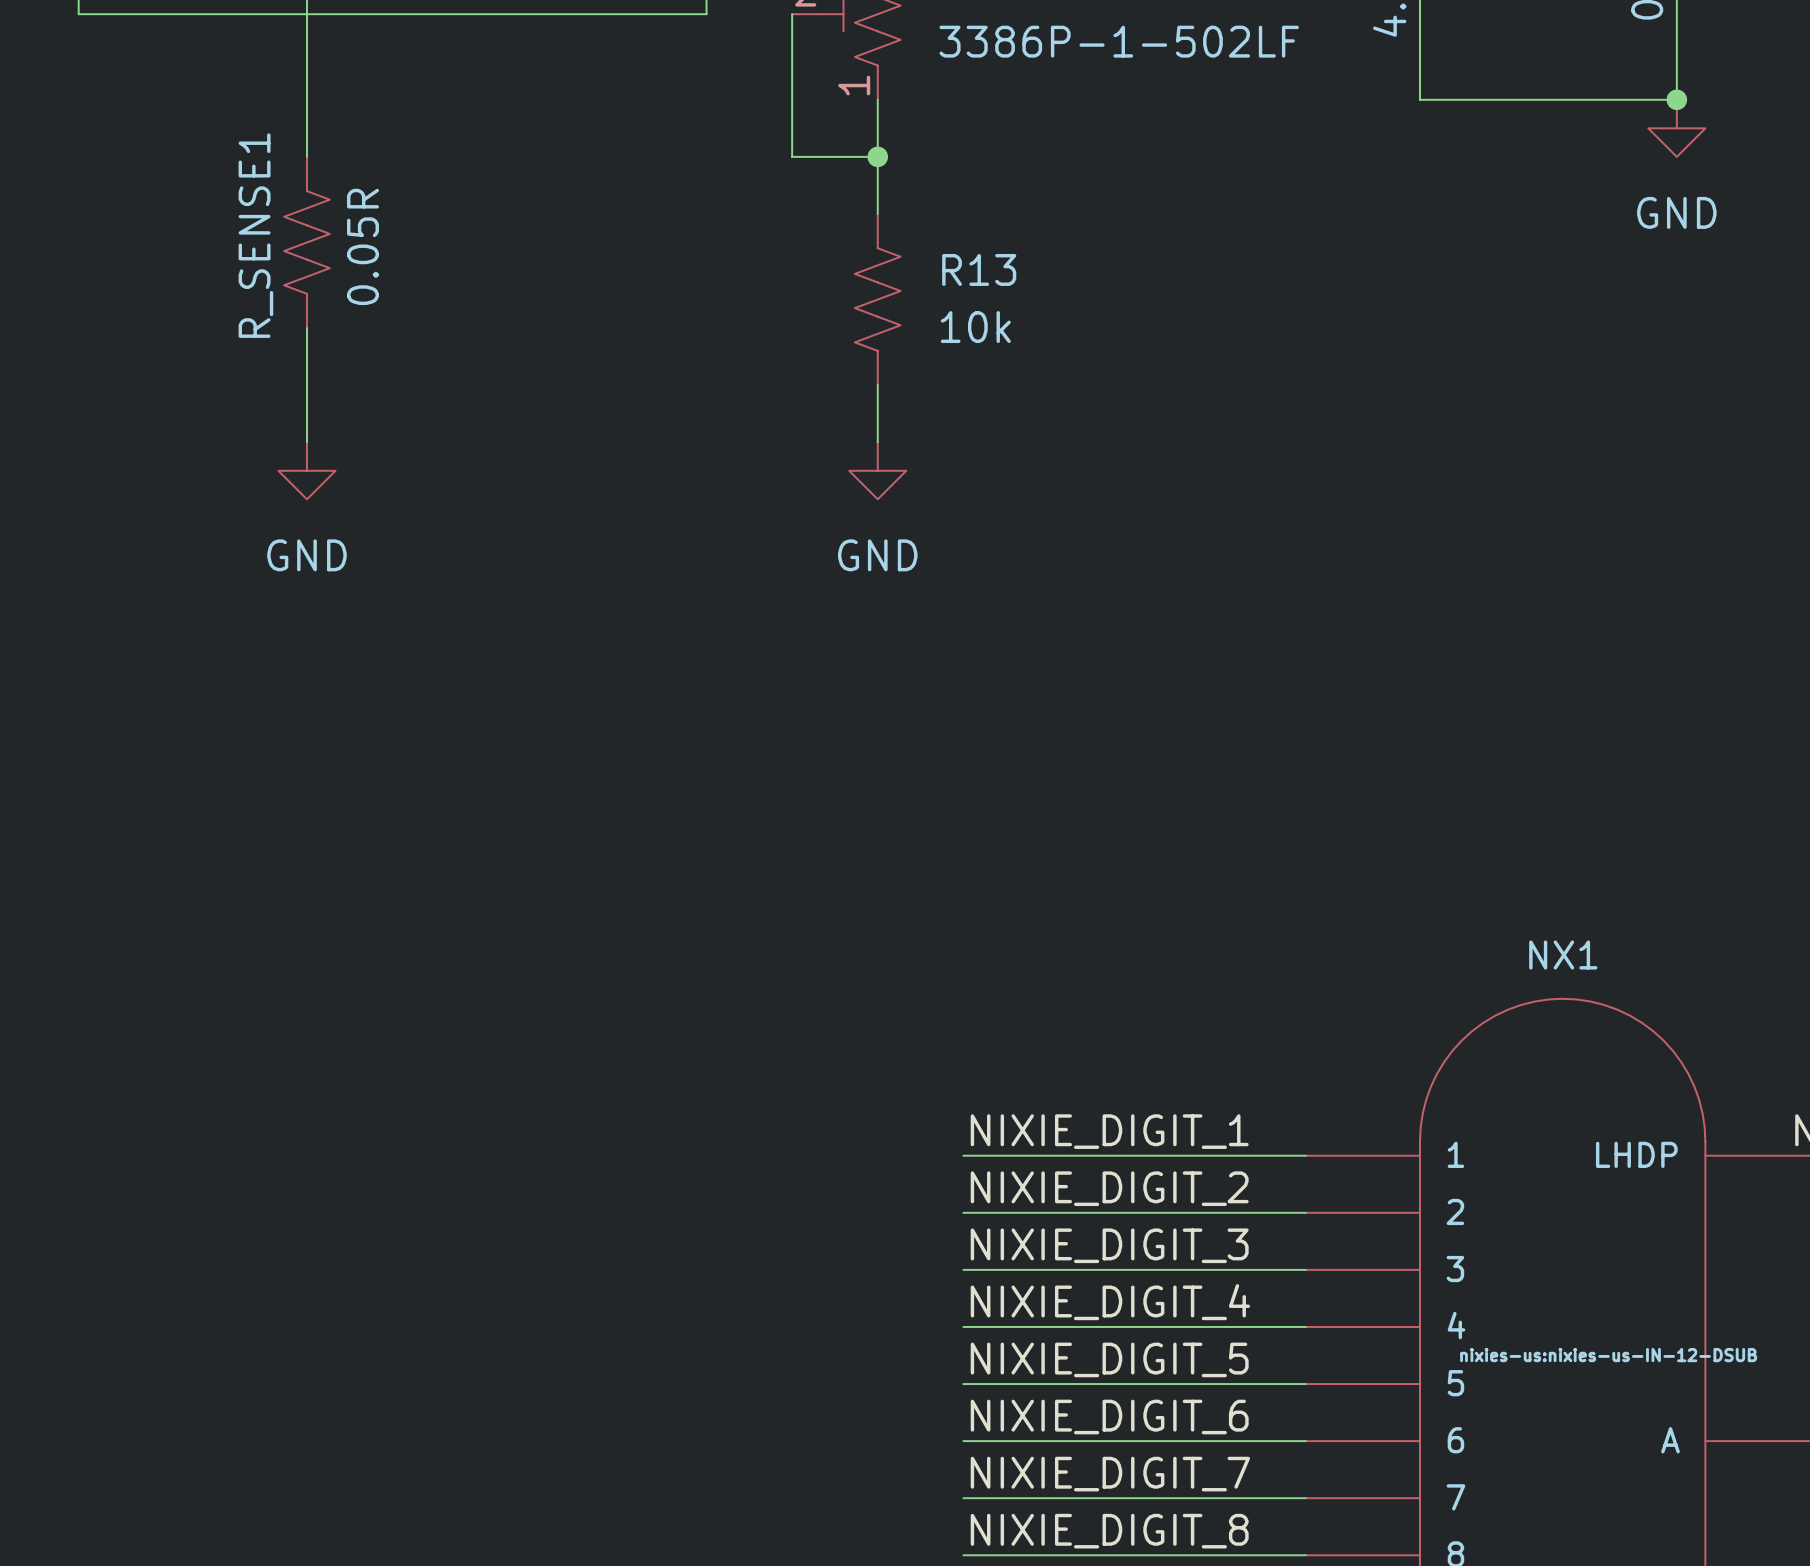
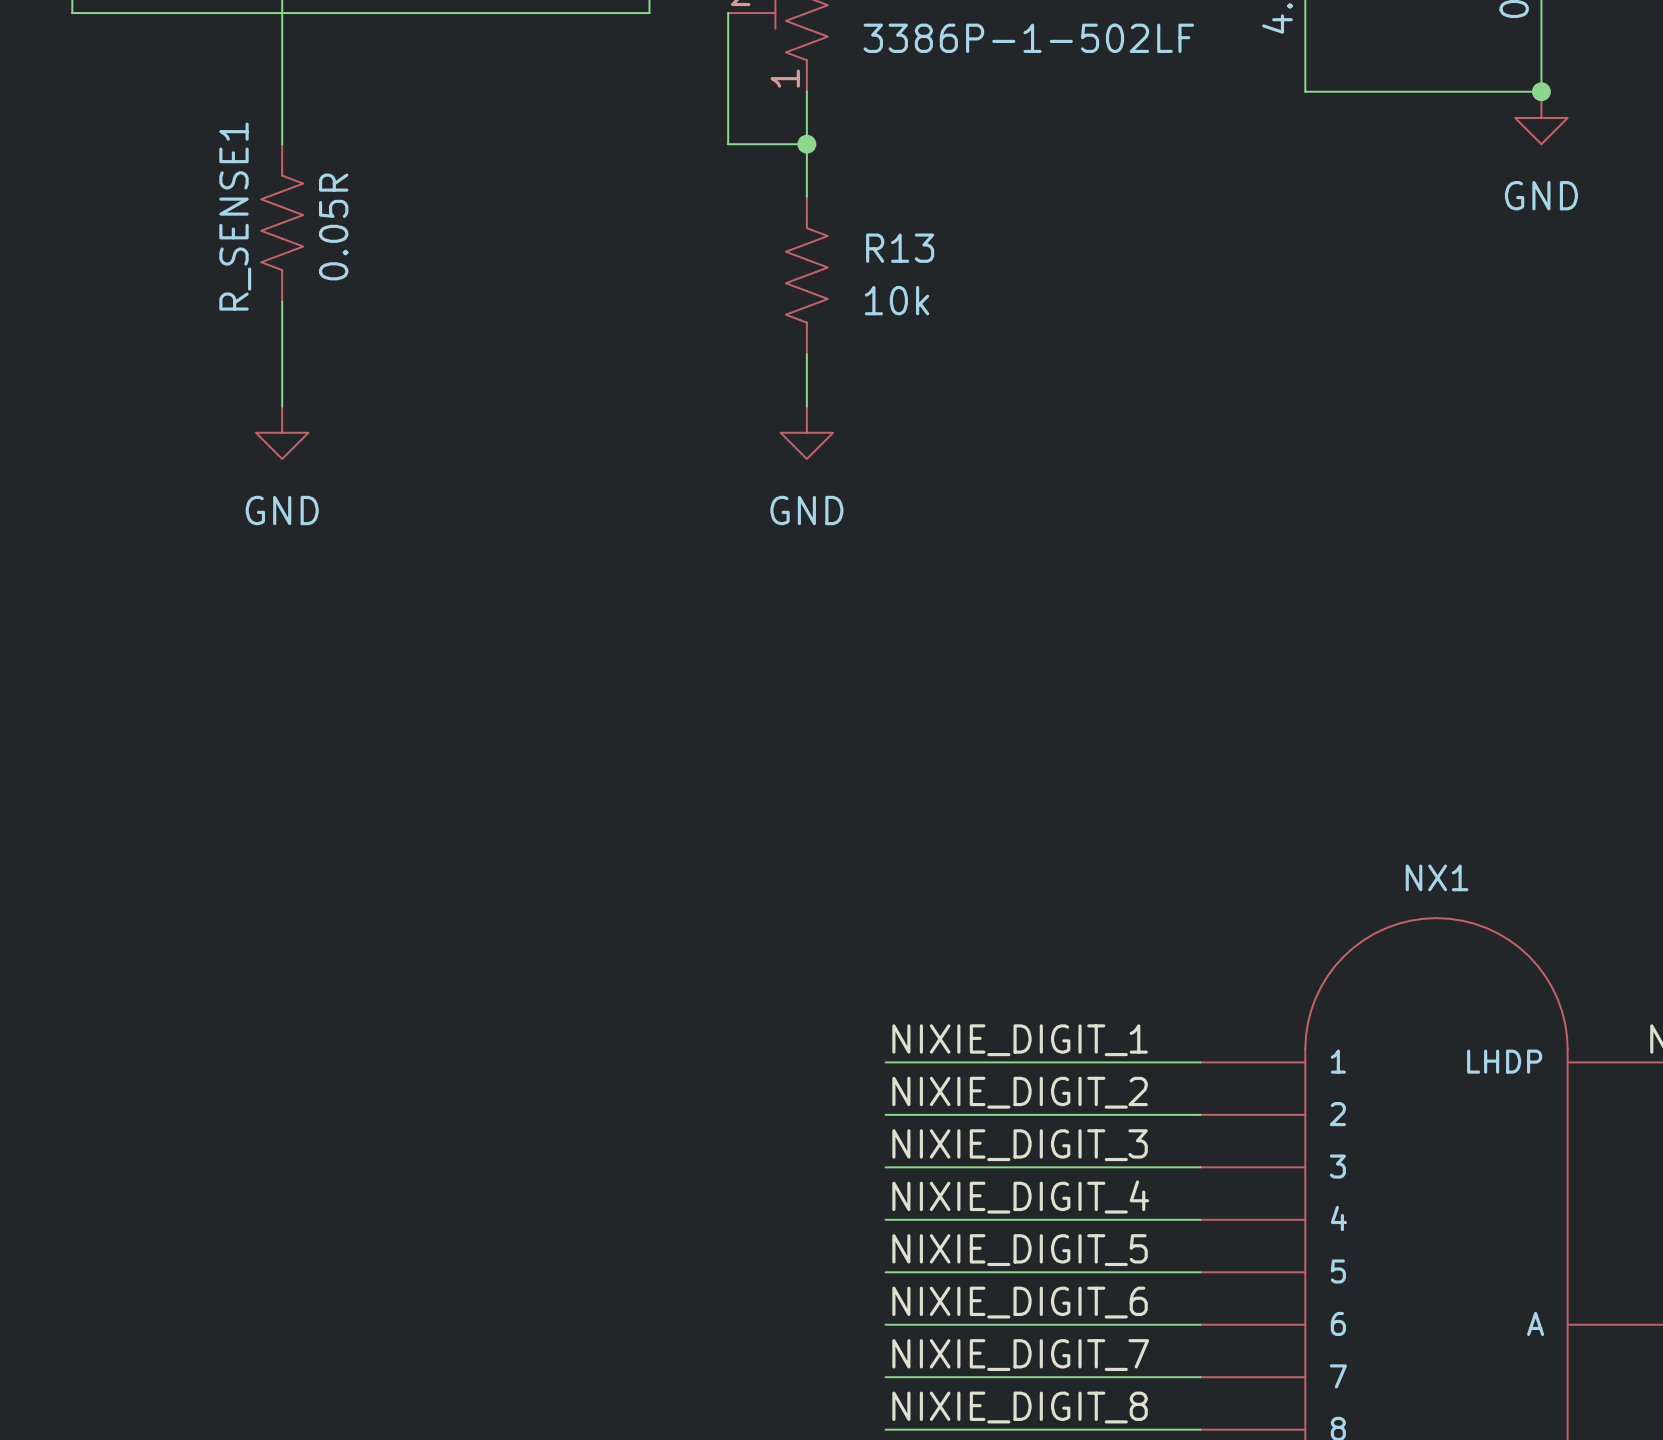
NX1 text: nixies-us:nixies-us-IN-12-DSUB (1608, 1355) -> none

